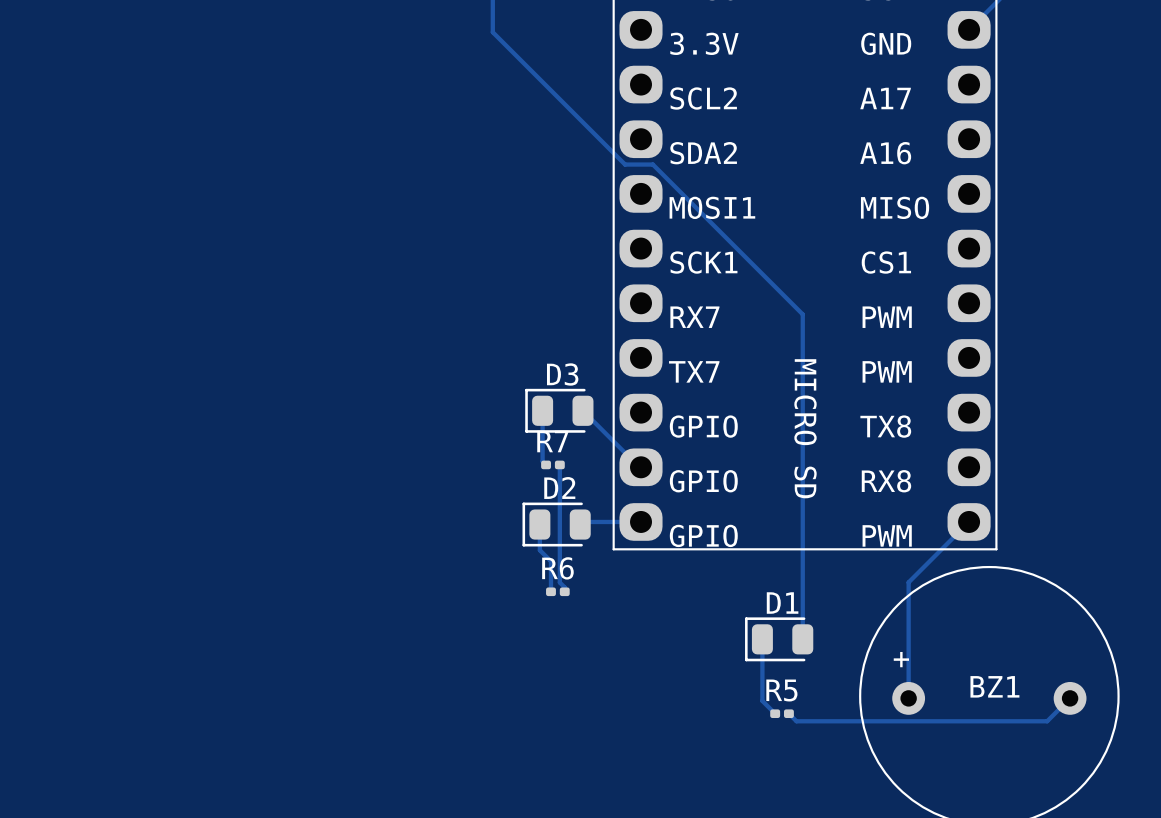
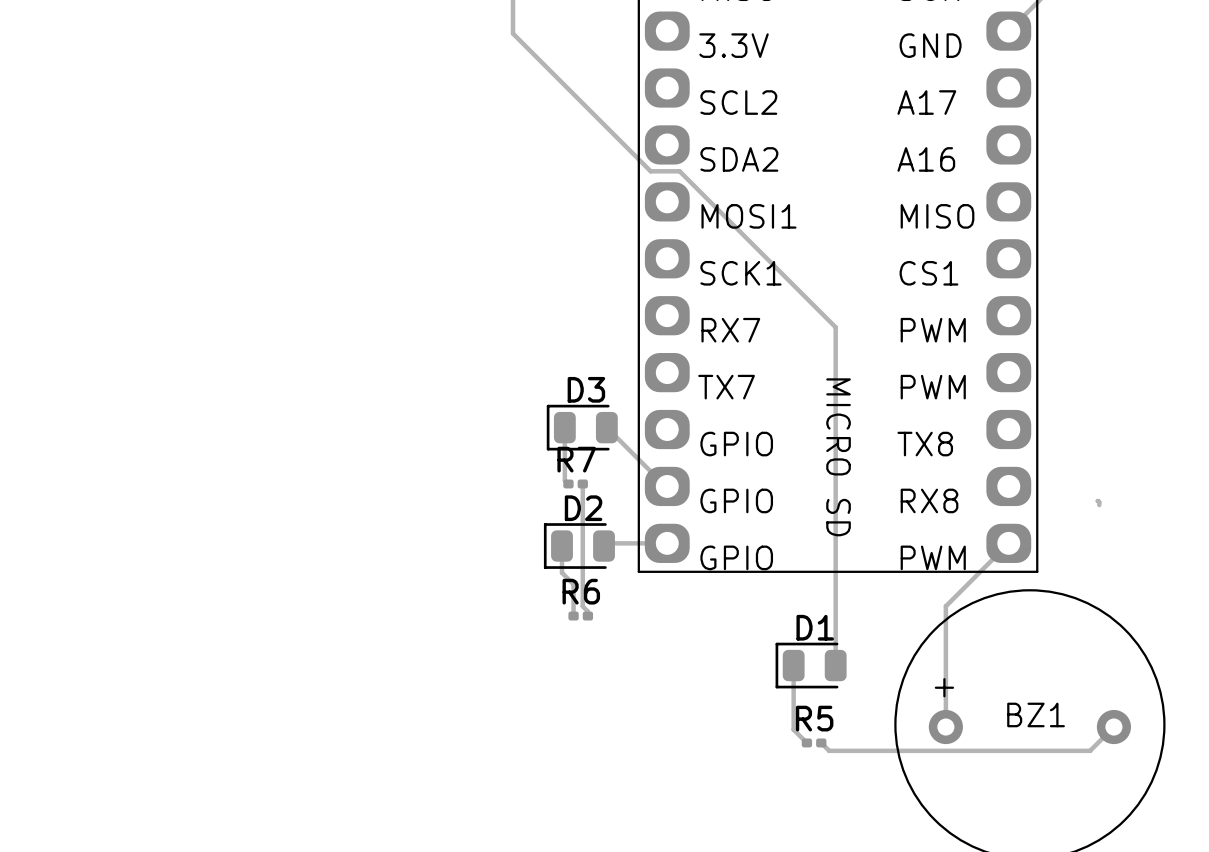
track: none -> (1097, 501) (1099, 505)

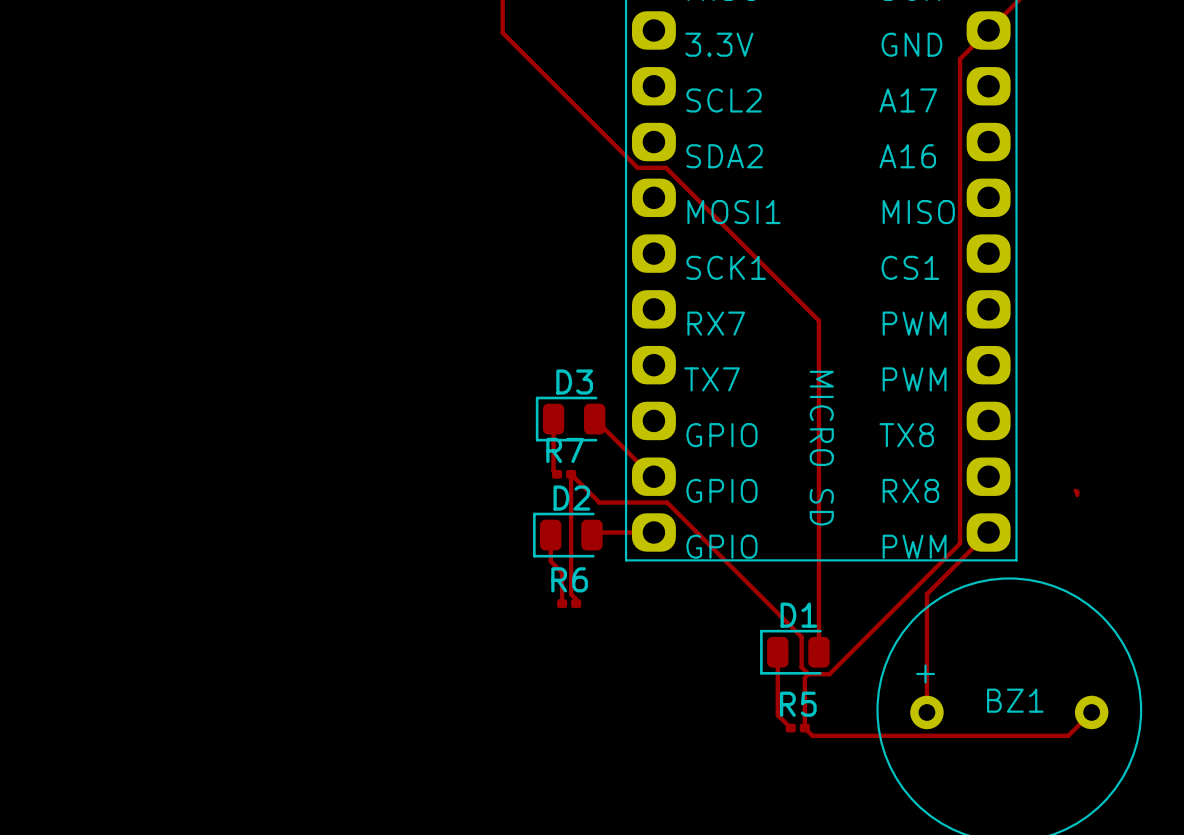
track: none -> (988, 30) (960, 59) (960, 543) (829, 674) (808, 674)
track: none -> (571, 474) (599, 502) (667, 502) (801, 637) (801, 667) (808, 674)
track: none -> (808, 674) (804, 677) (804, 728)

